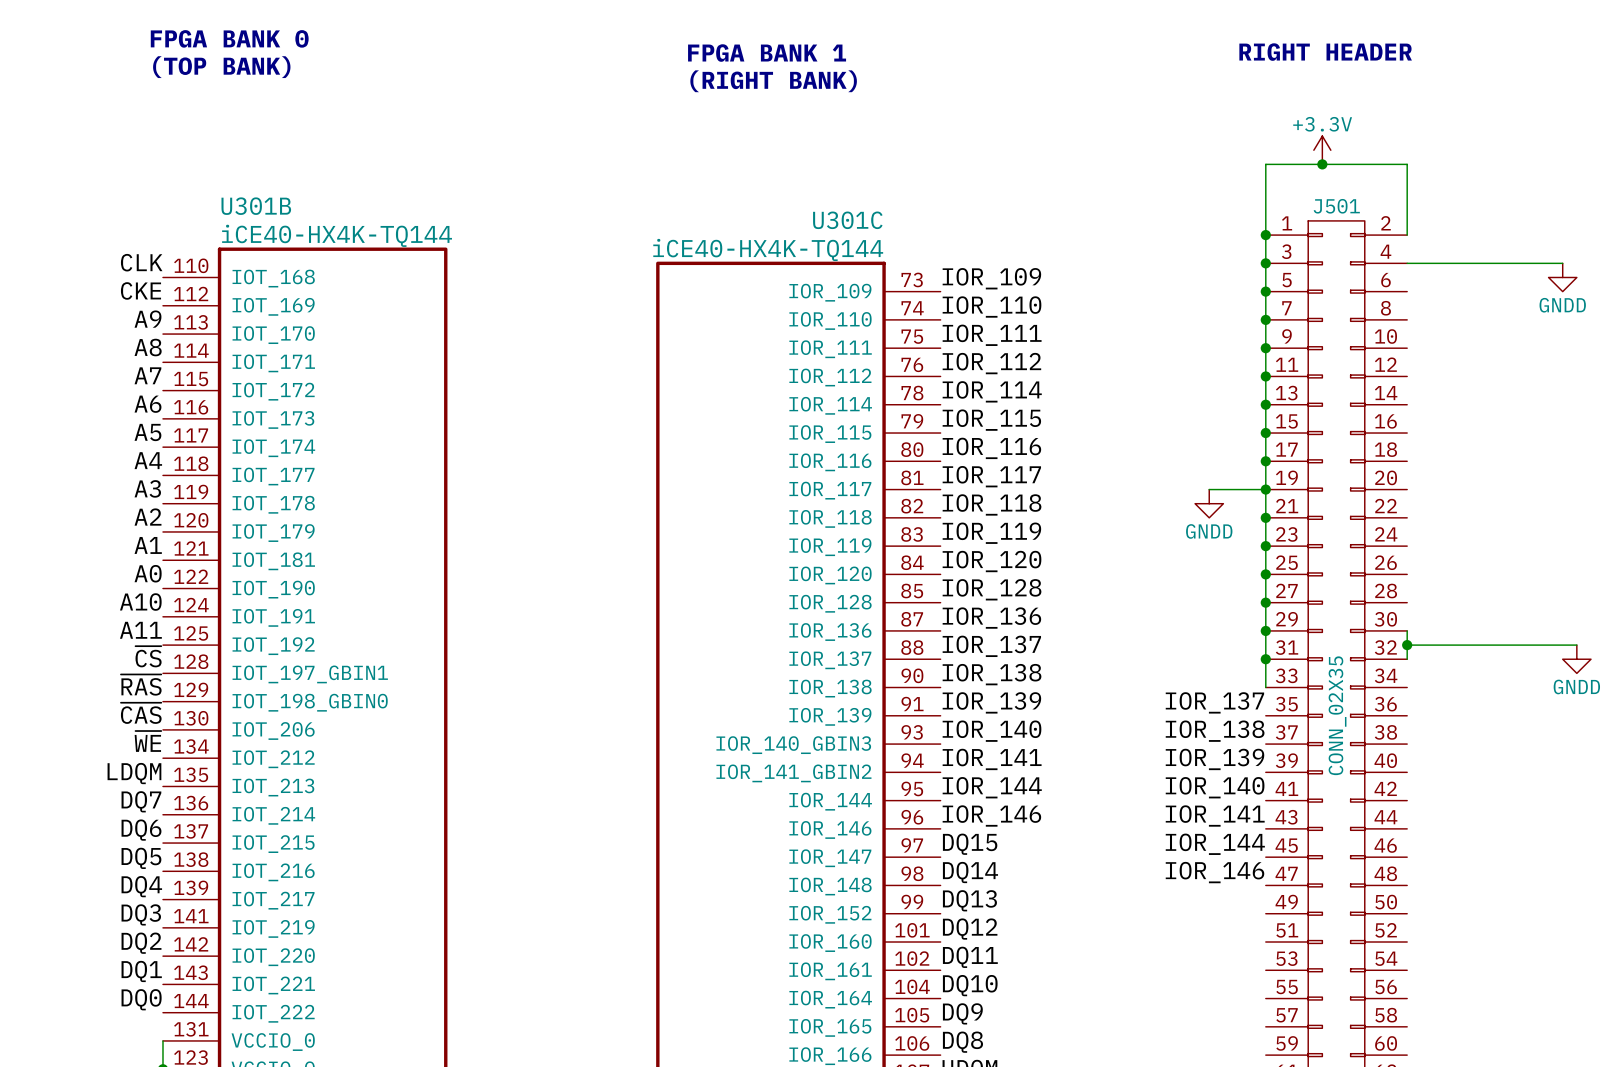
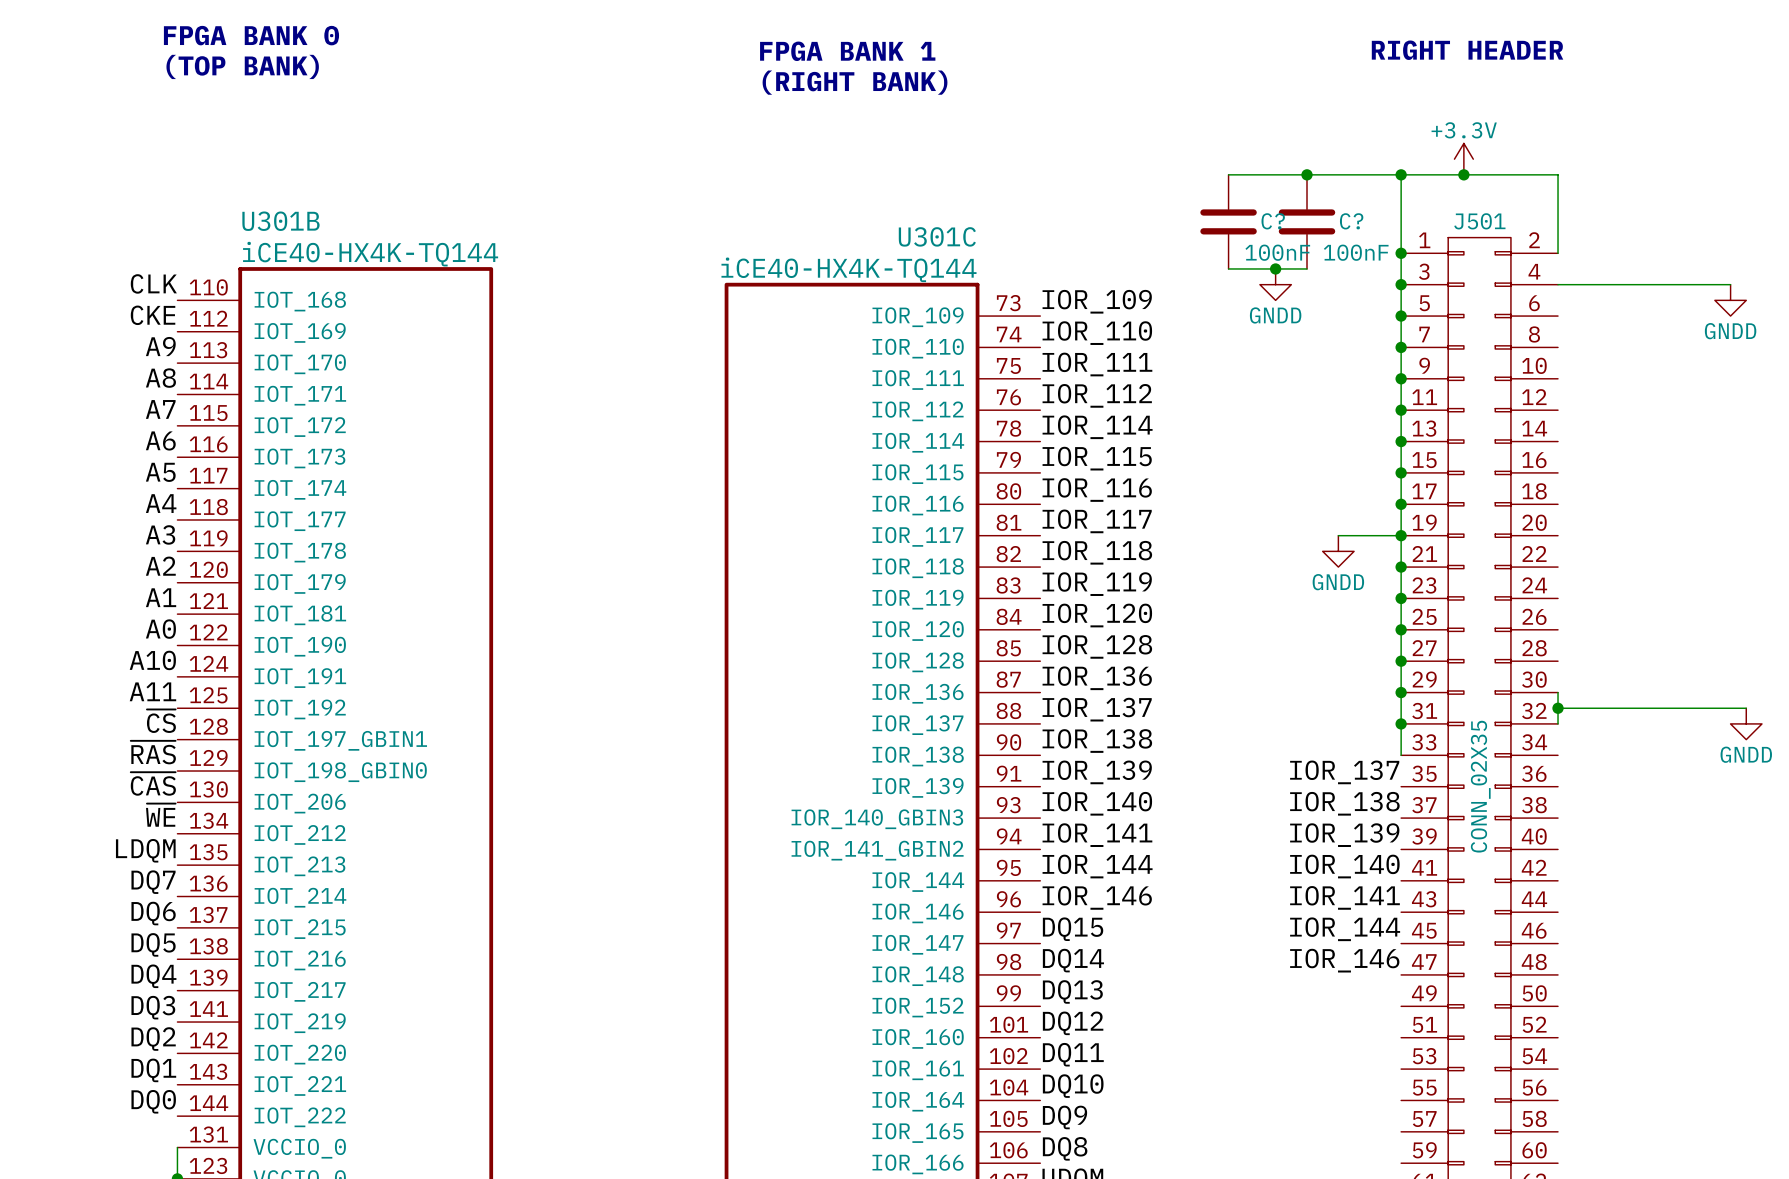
wire: none -> (1228, 174) (1401, 174)
junction: none -> (1307, 174)
junction: none -> (1401, 174)
C?: none -> 100nF (1228, 221)
C?: none -> 100nF (1307, 221)
wire: none -> (1228, 268) (1307, 268)
junction: none -> (1275, 268)
power symbol: none -> GNDD (1275, 284)

